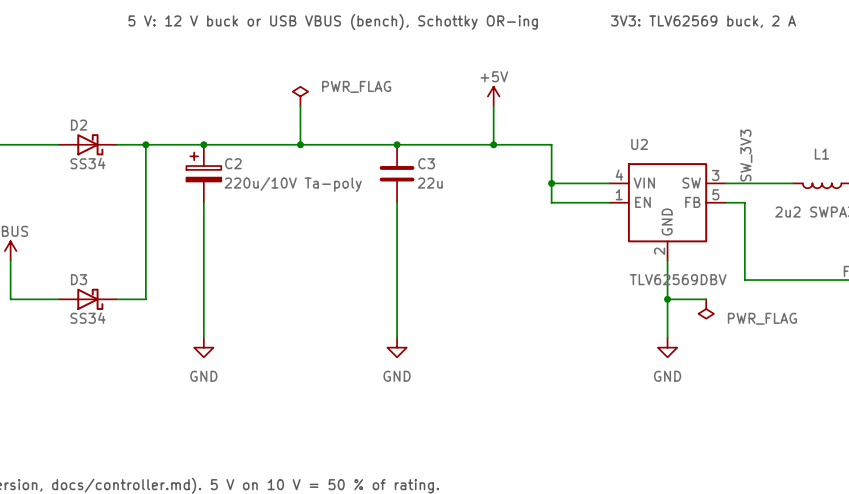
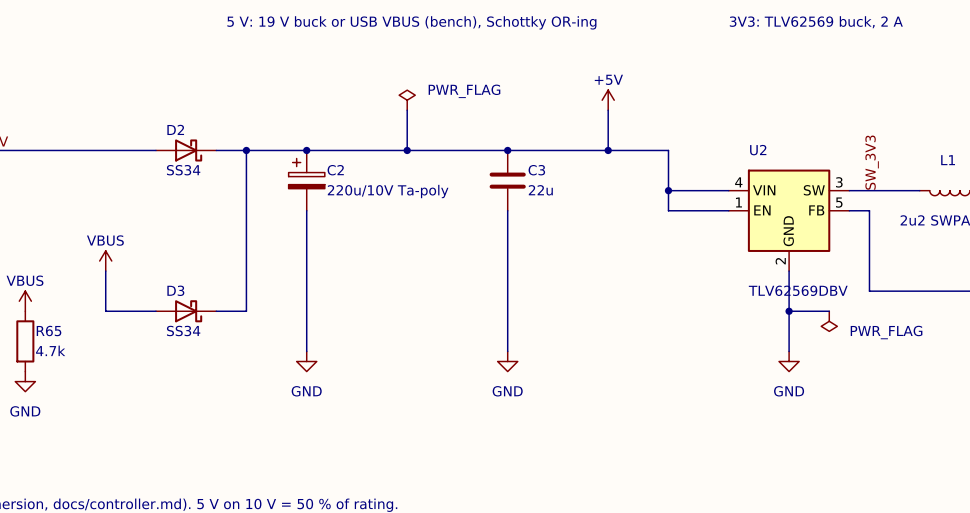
text: 5 V: 12 V buck or USB VBUS (bench), Schottky OR-ing (333, 22) -> 5 V: 19 V buck or USB VBUS (bench), Schottky OR-ing (411, 22)

